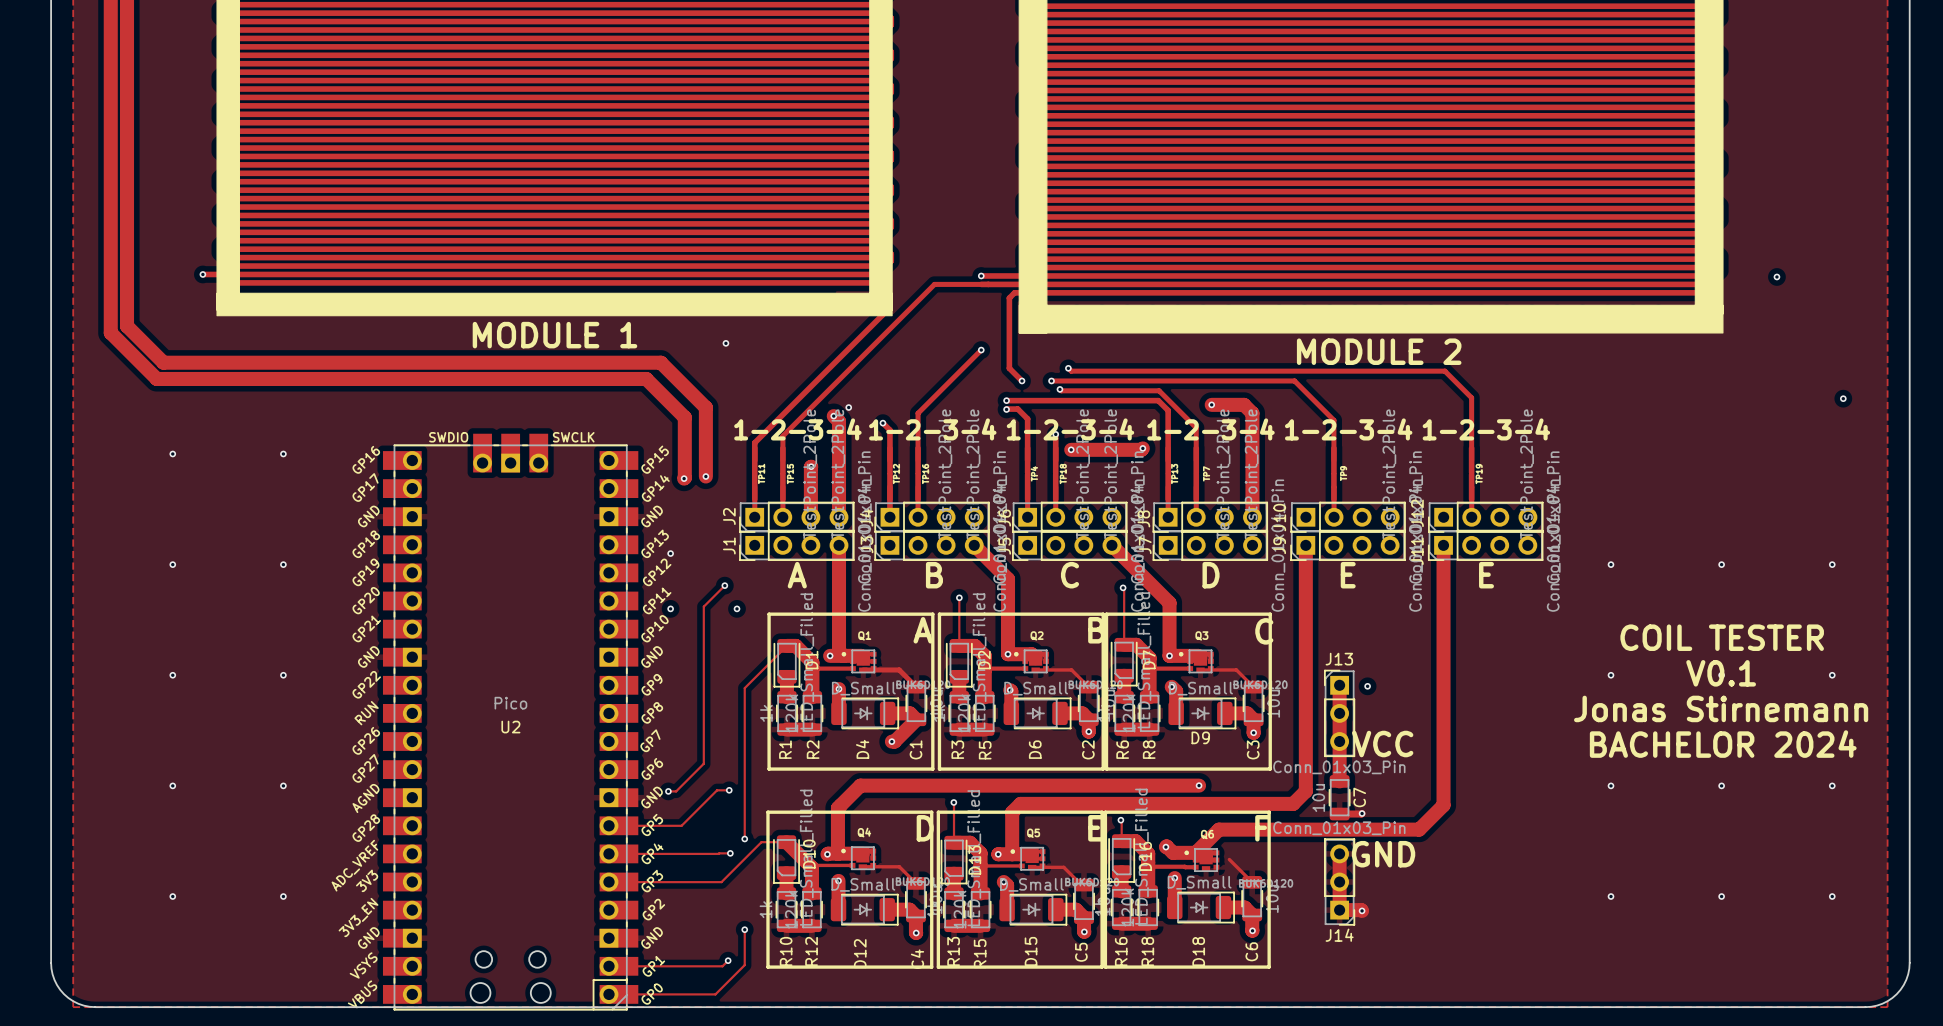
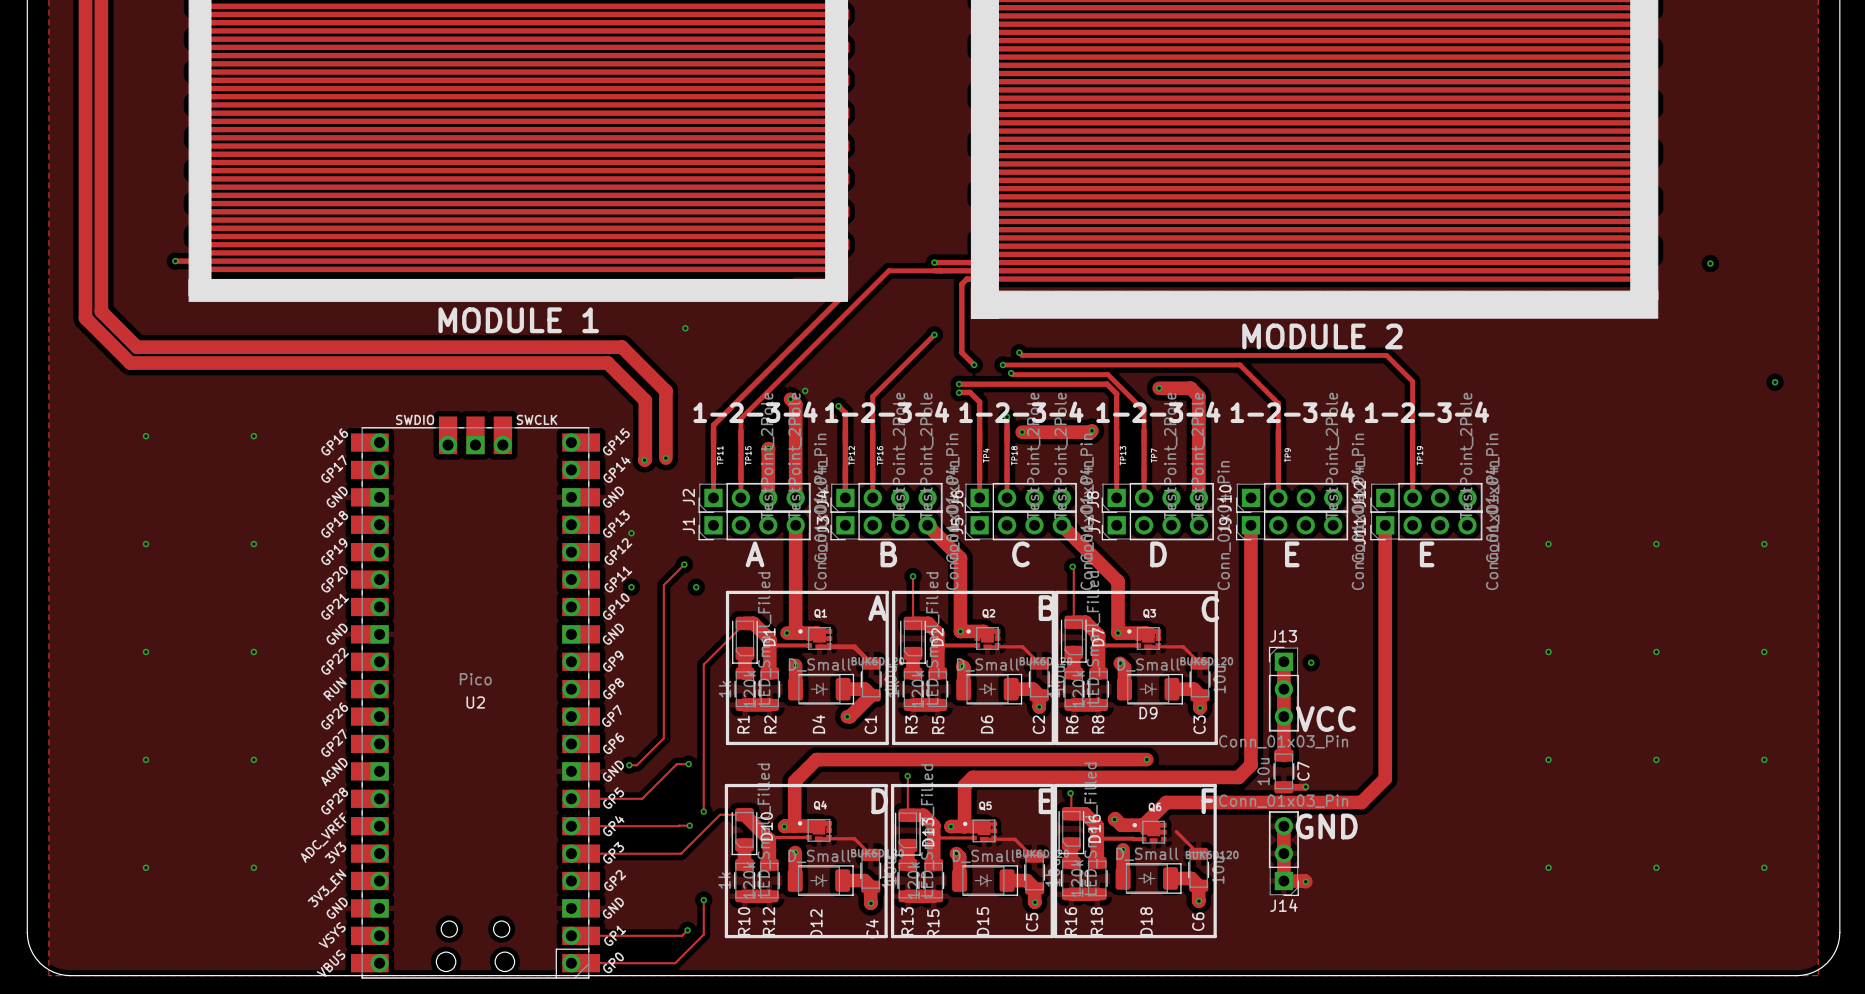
text: COIL TESTER (1722, 637) -> none
text: V0.1 (1721, 673) -> none
text: Jonas Stirnemann (1721, 708) -> none
text: BACHELOR 2024 (1723, 744) -> none

